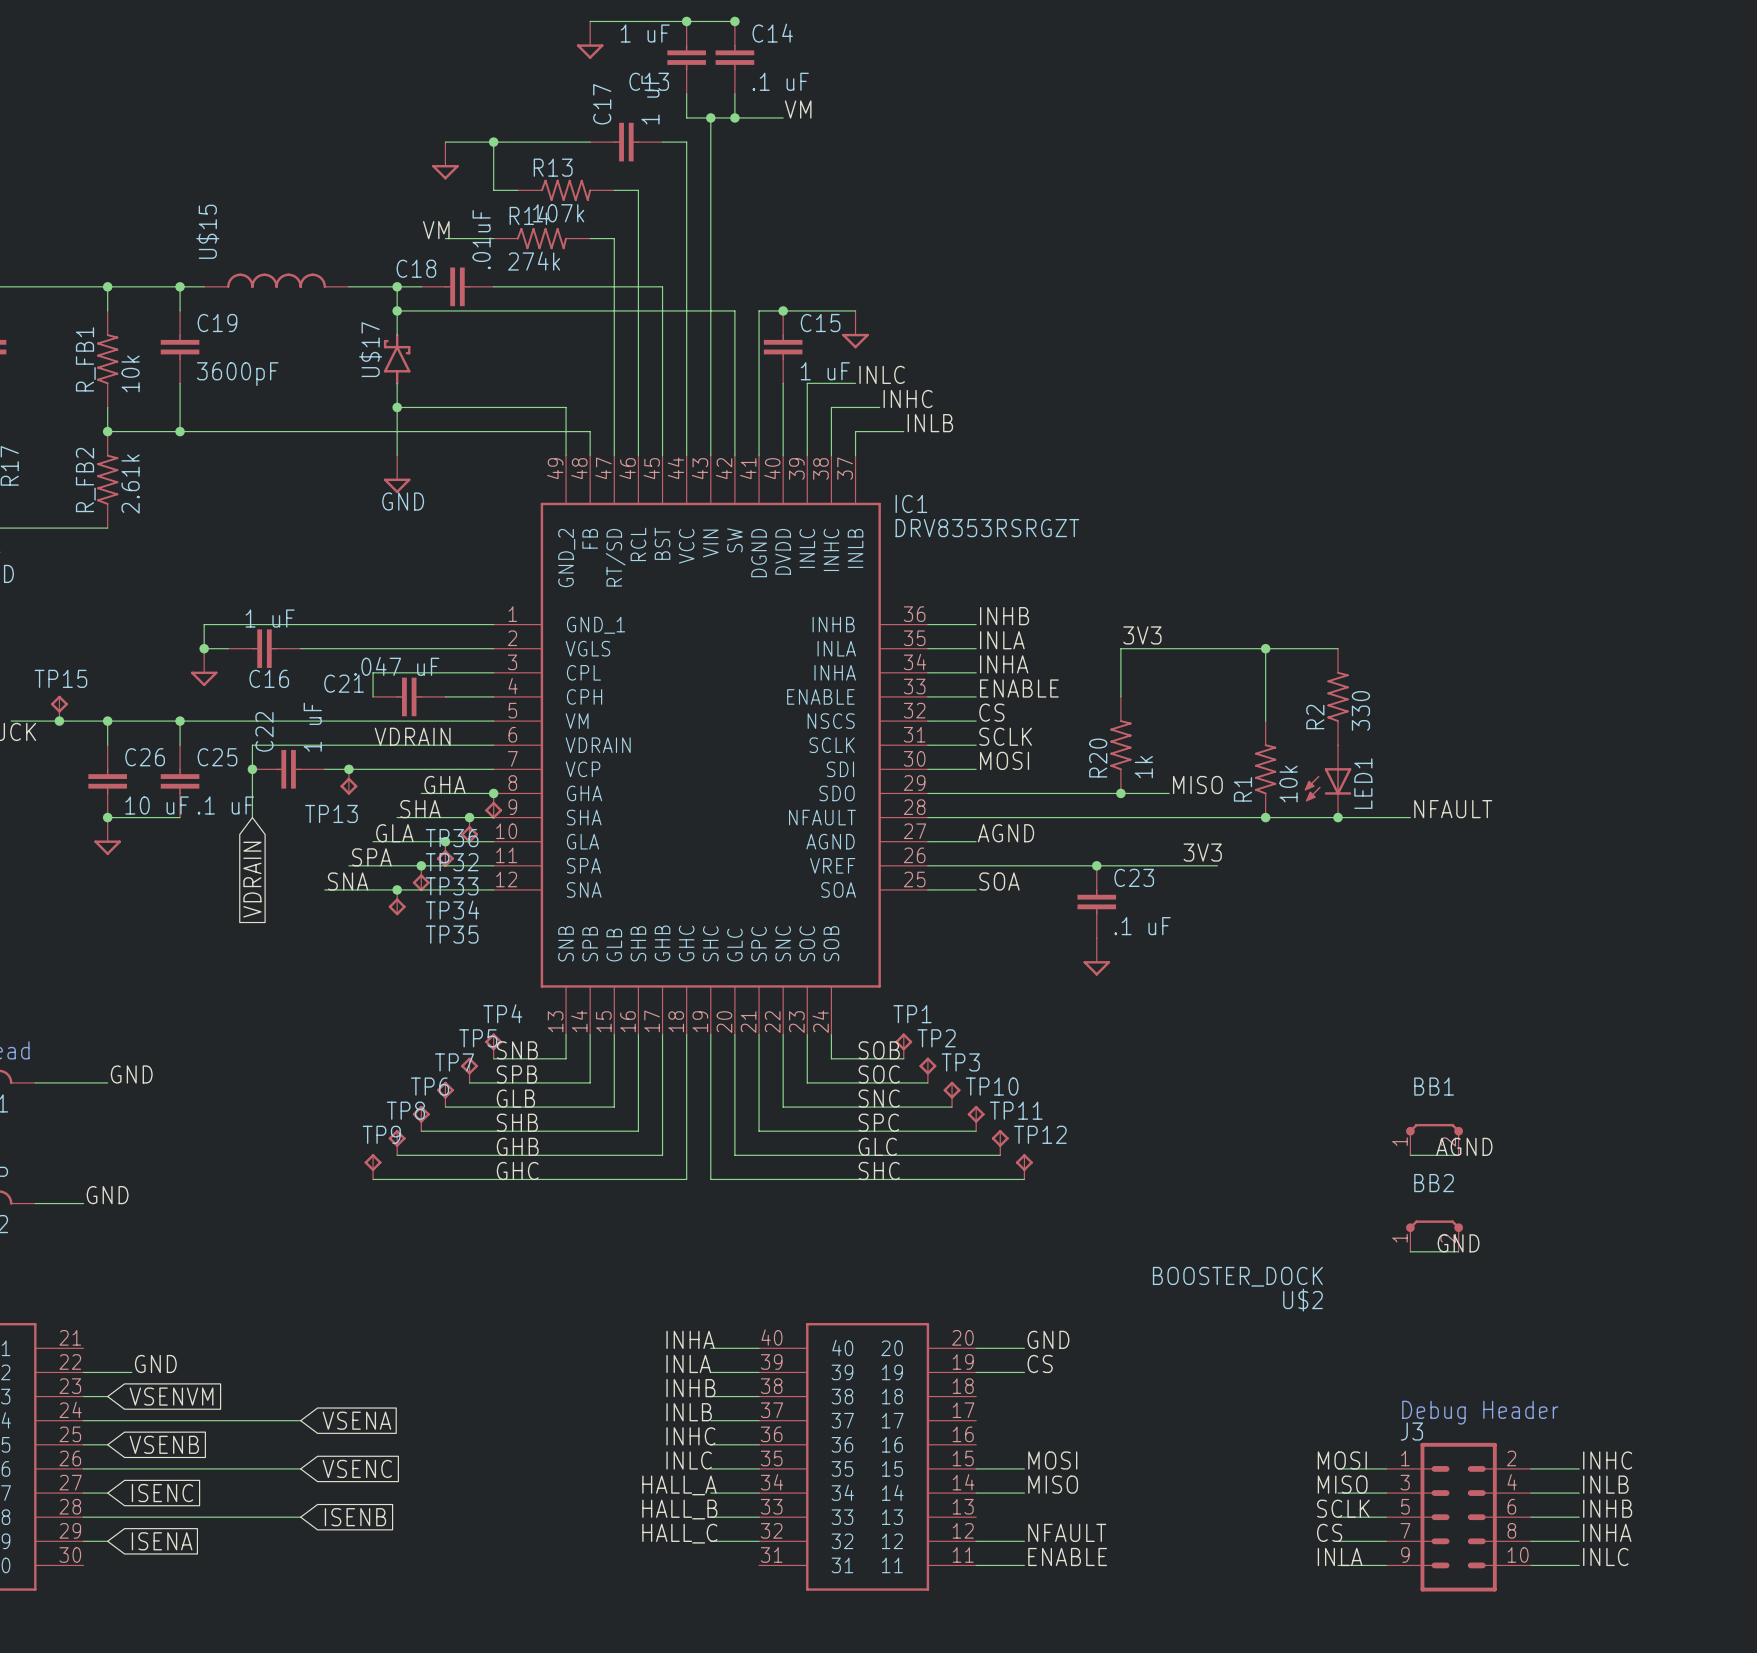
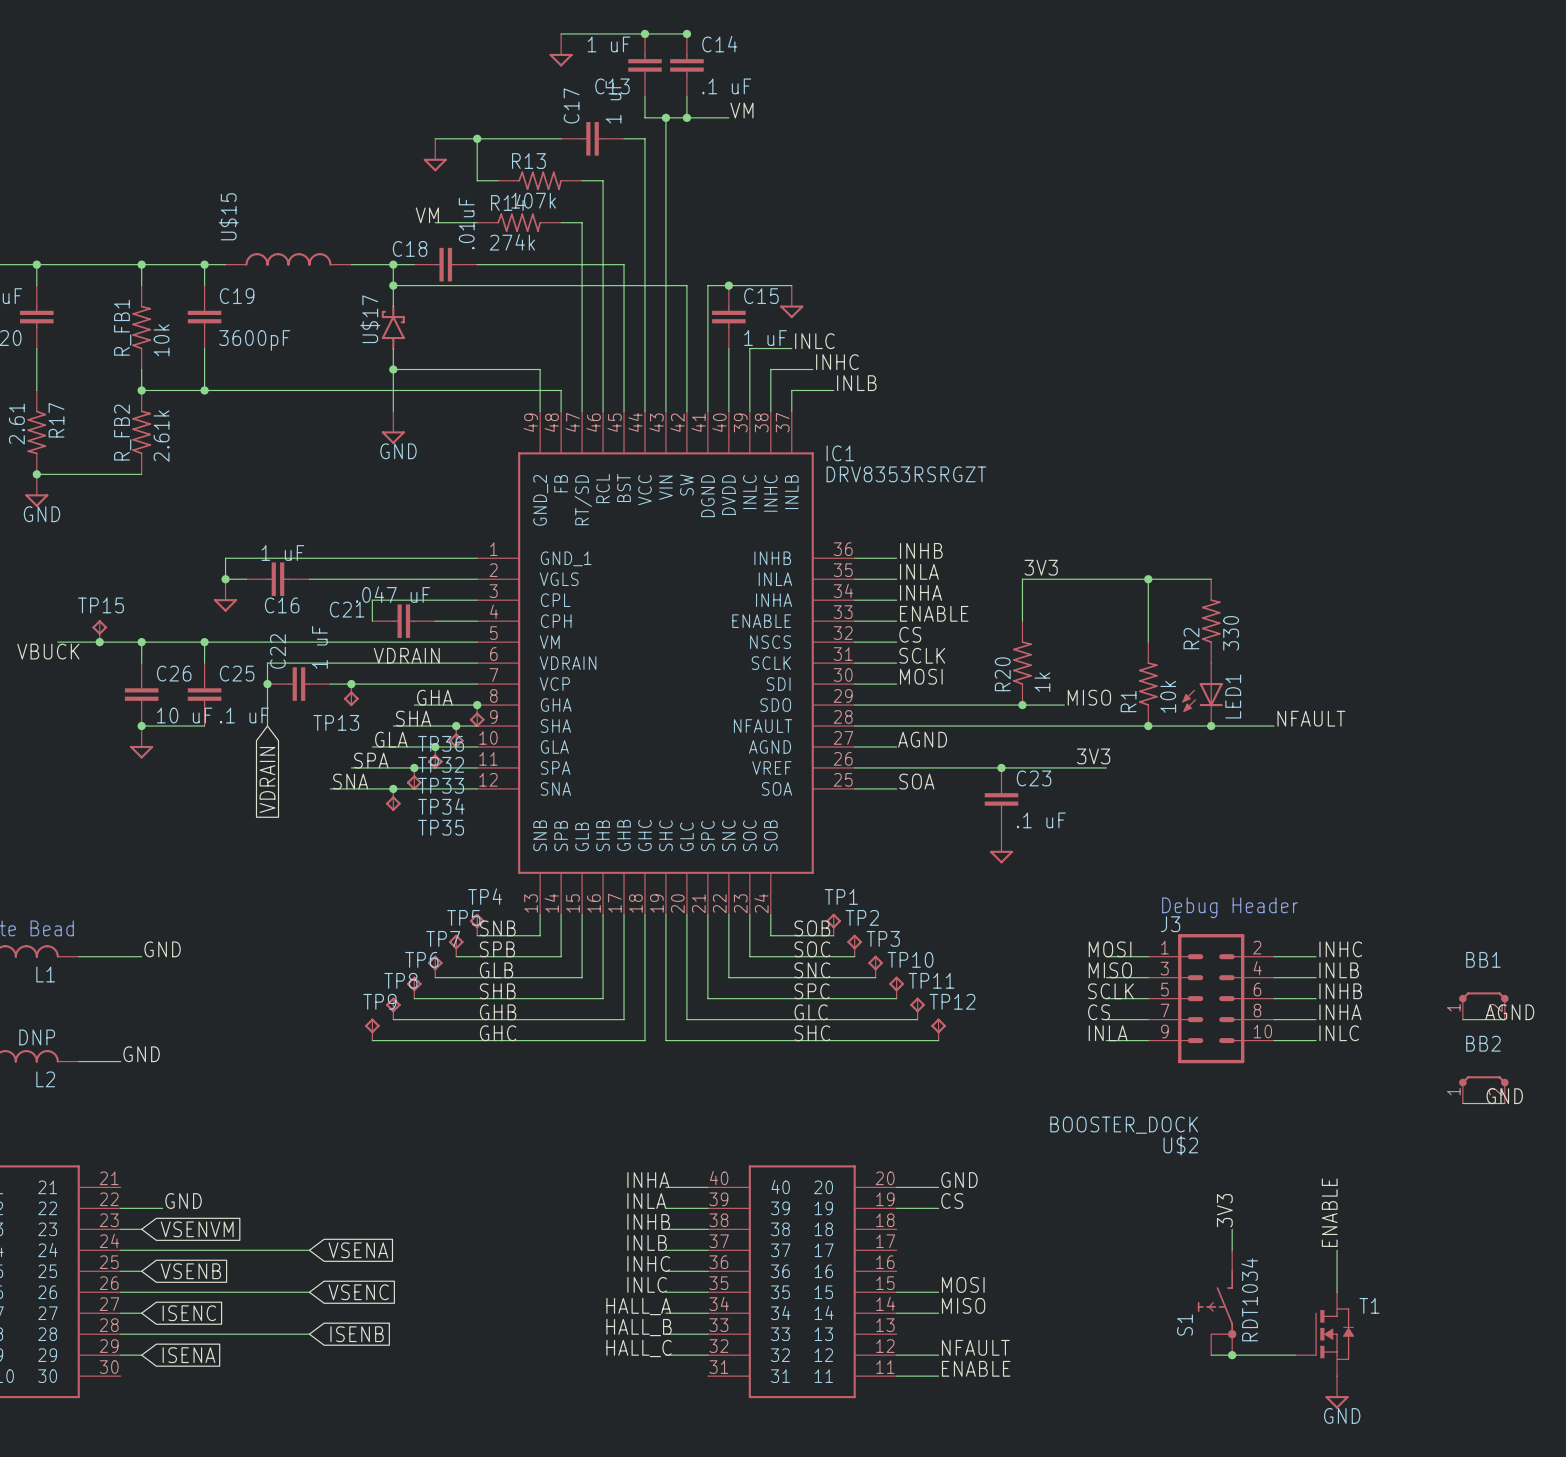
text: none -> Debug Header (1230, 907)
label: none -> MOSI (1110, 949)
label: none -> INHC (1340, 949)
wire: none -> (1106, 956) (1148, 956)
wire: none -> (1274, 956) (1316, 956)
label: none -> MISO (1110, 970)
label: none -> INLB (1339, 970)
wire: none -> (1106, 977) (1148, 977)
wire: none -> (1274, 977) (1316, 977)
label: none -> SCLK (1111, 991)
label: none -> INHB (1340, 991)
wire: none -> (1106, 998) (1148, 998)
wire: none -> (1274, 998) (1316, 998)
BB1 position: (1434, 1139) -> (1483, 1005)
label: none -> CS (1099, 1012)
label position: AGND (1464, 1146) -> AGND (1509, 1012)
label: none -> INHA (1340, 1012)
wire: none -> (1106, 1019) (1148, 1019)
wire: none -> (1462, 1019) (1504, 1019)
label: none -> INLA (1108, 1033)
label: none -> INLC (1339, 1033)
wire: none -> (1106, 1040) (1148, 1040)
BB2 position: (1434, 1236) -> (1483, 1089)
label position: GND (1458, 1243) -> GND (1504, 1096)
wire: (1410, 1251) (1458, 1251) -> (1274, 1040) (1316, 1040)
wire: none -> (1462, 1103) (1504, 1103)
label: none -> 3V3 (1224, 1210)
label: none -> ENABLE (1329, 1212)
wire: none -> (1232, 1229) (1232, 1250)
text: Debug Header (1480, 1412) -> none
wire: none -> (1337, 1250) (1337, 1292)
label: MOSI (1342, 1460) -> none
label: INHC (1607, 1460) -> none
wire: (1338, 1468) (1386, 1468) -> none
wire: (1531, 1468) (1579, 1468) -> none
S1: none -> RDT1034 (1217, 1302)
label: MISO (1342, 1484) -> none
label: INLB (1605, 1484) -> none
wire: (1338, 1493) (1386, 1493) -> none
wire: (1531, 1493) (1579, 1493) -> none
label: SCLK (1343, 1508) -> none
label: INHB (1607, 1508) -> none
J3 position: (1458, 1517) -> (1211, 998)
T1: none -> (1324, 1334)
wire: (1531, 1517) (1579, 1517) -> none
label: CS (1329, 1532) -> none
label: INHA (1607, 1532) -> none
junction: none -> (1232, 1355)
wire: (1531, 1541) (1579, 1541) -> none
label: INLA (1340, 1556) -> none
label: INLC (1605, 1556) -> none
wire: (1338, 1565) (1386, 1565) -> none
wire: (1531, 1565) (1579, 1565) -> none
power symbol: none -> GND (1337, 1392)

